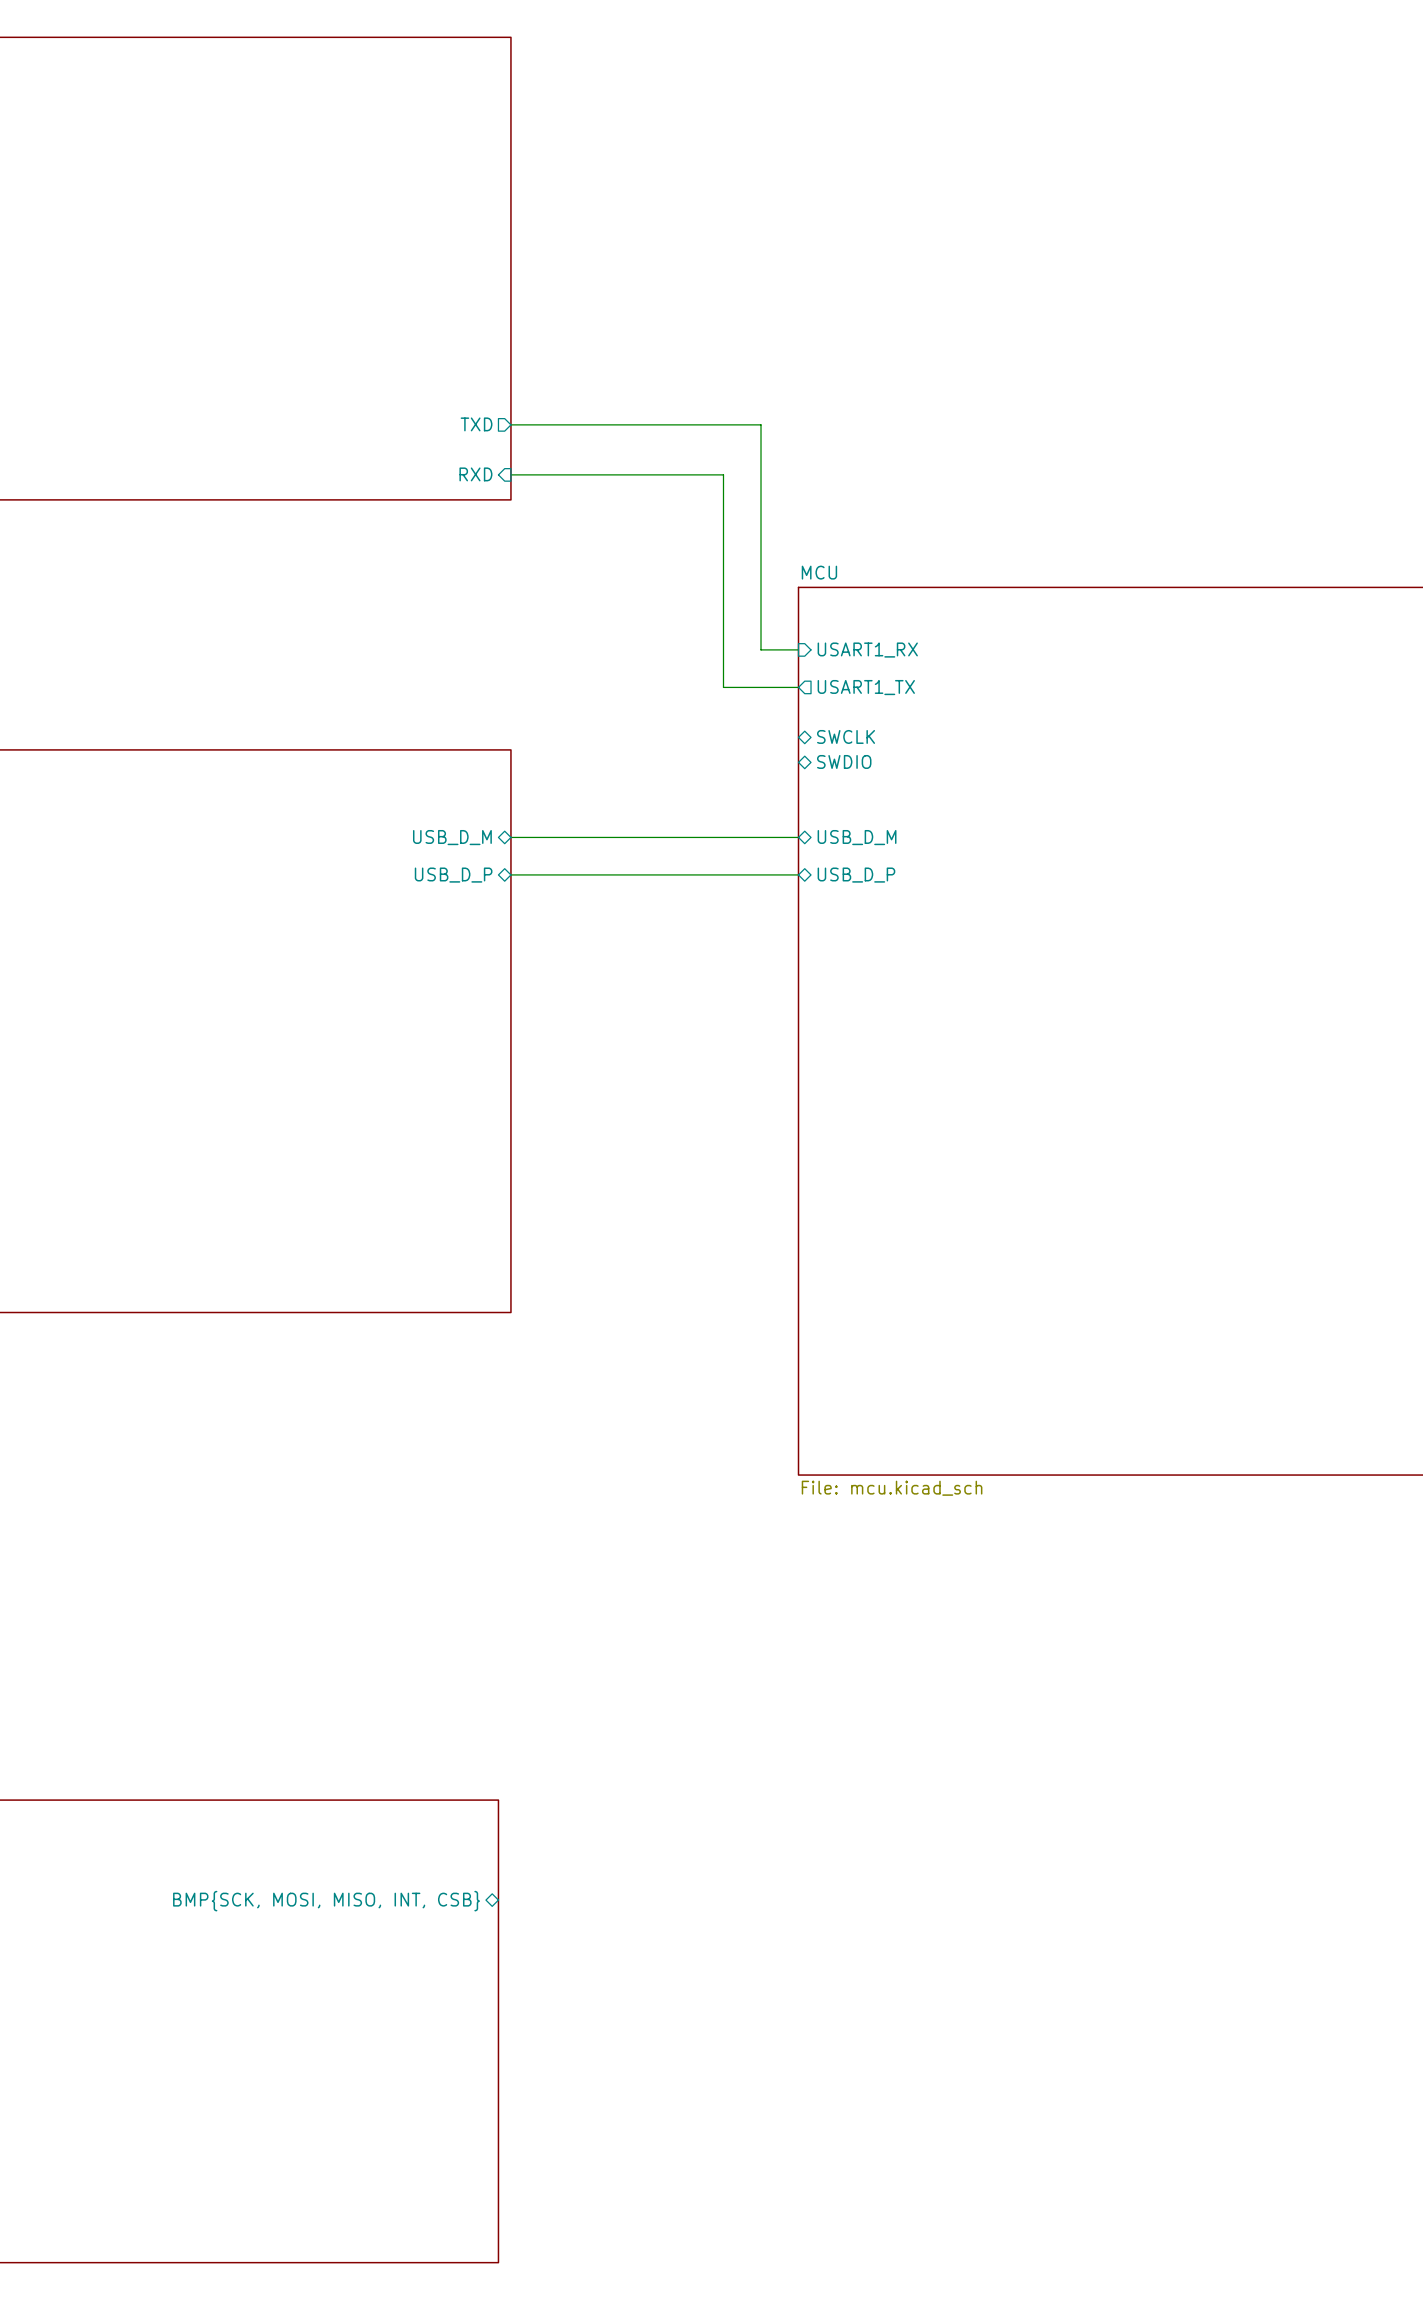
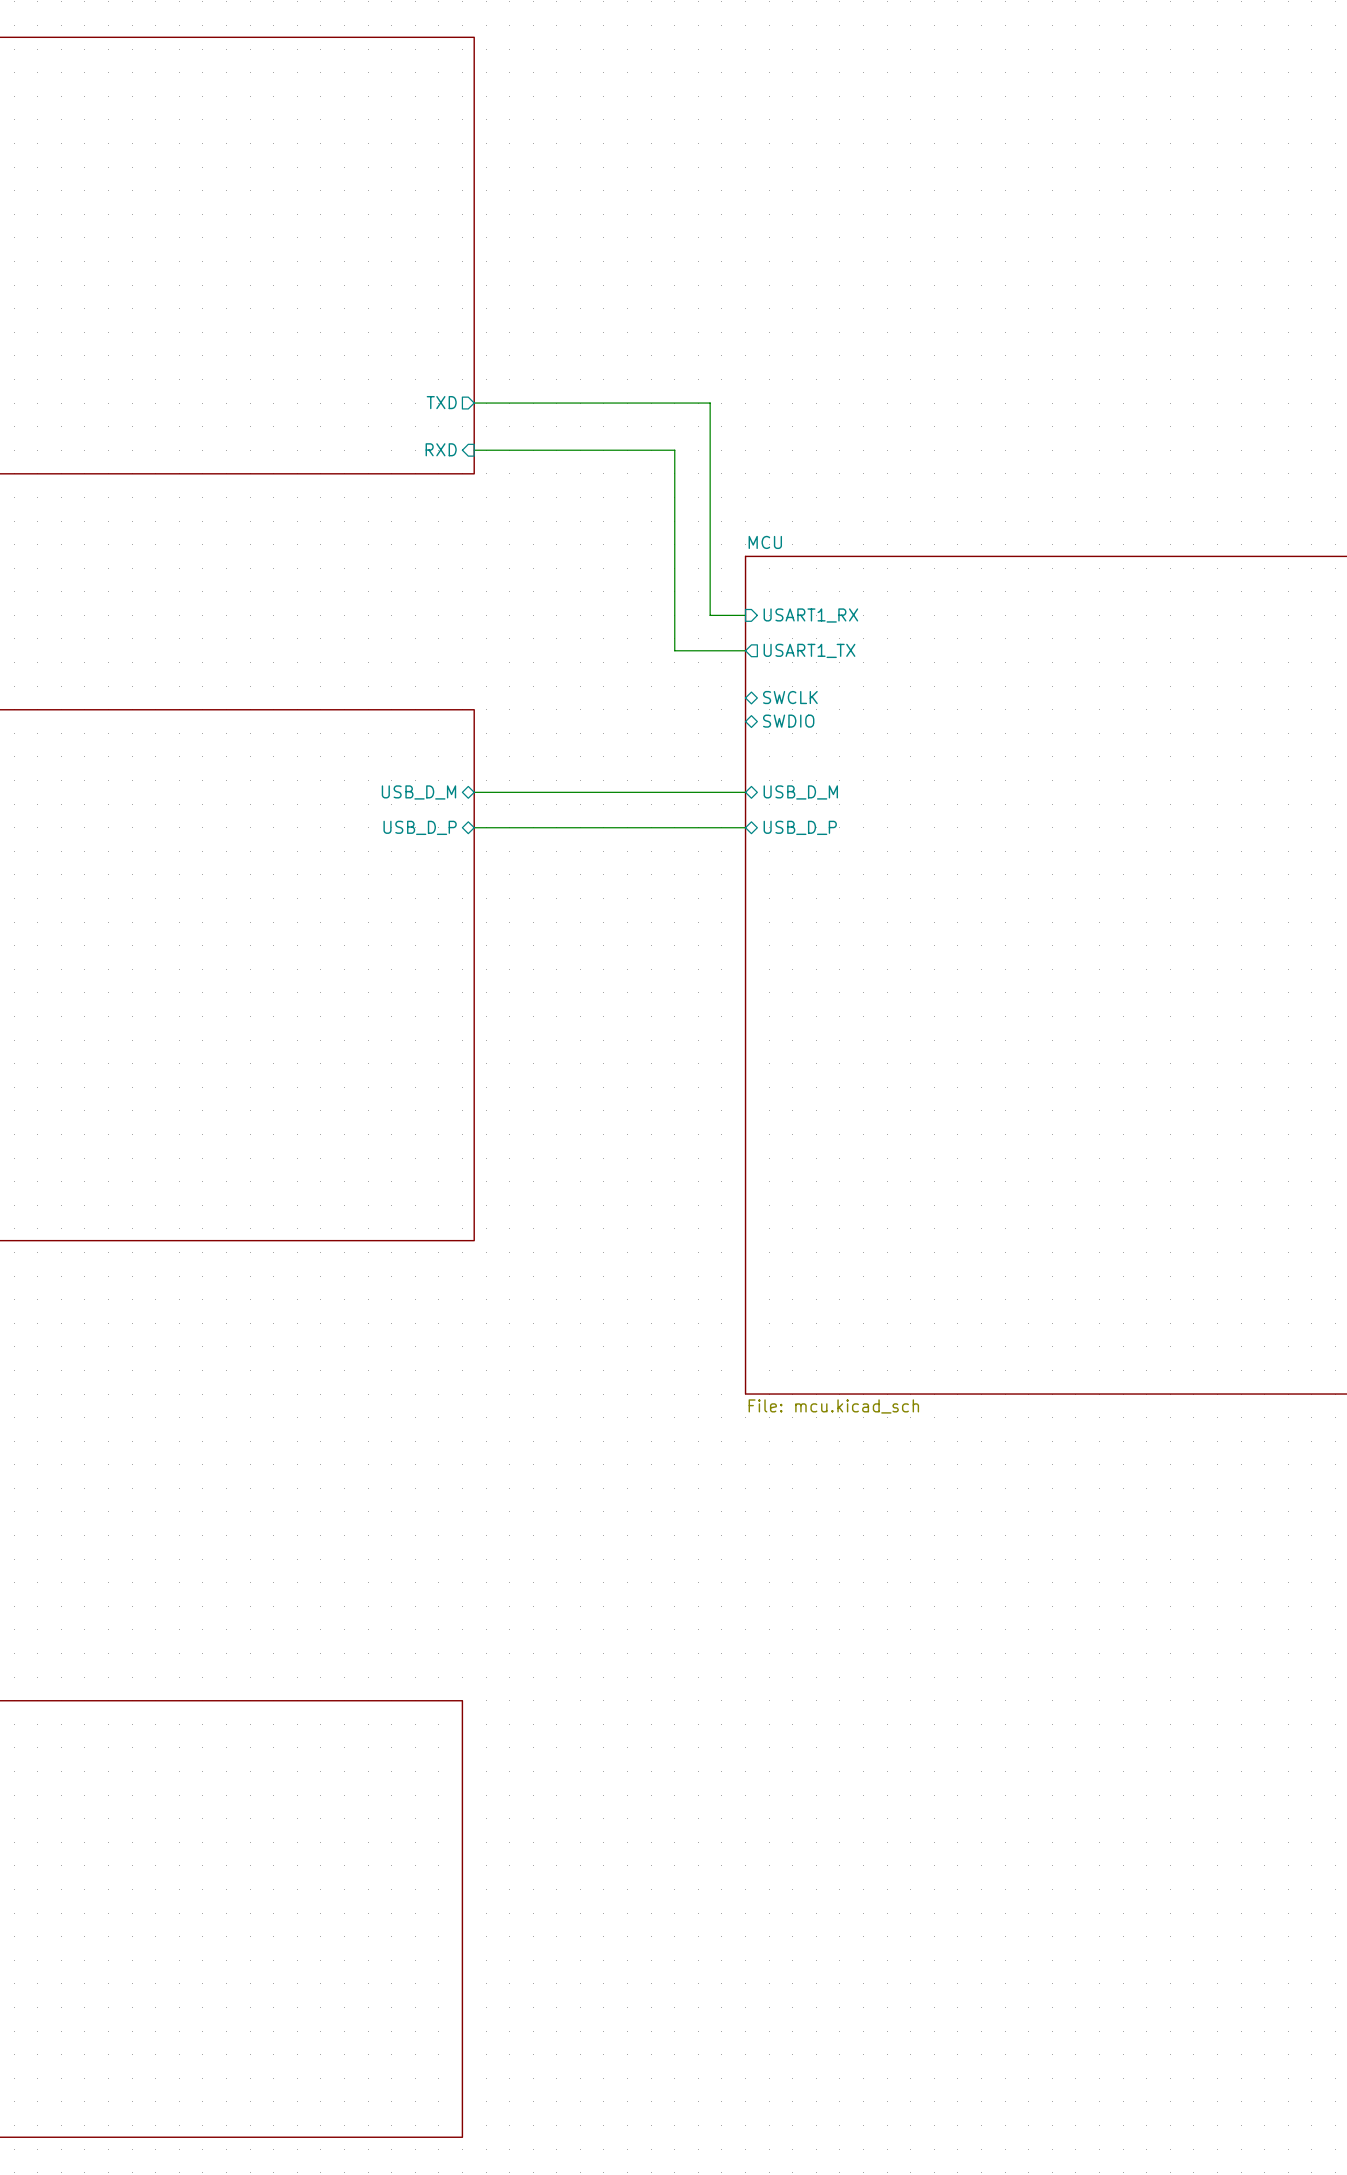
sheet pin: BMP{SCK, MOSI, MISO, INT, CSB} (326, 1901) -> none

